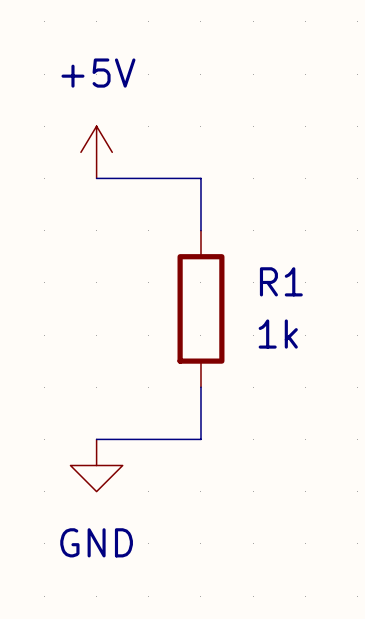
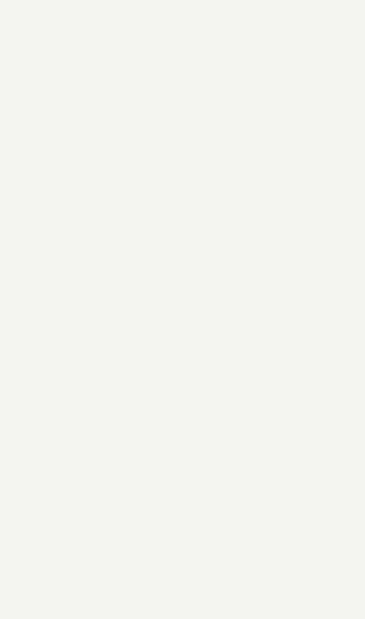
power symbol: +5V (96, 152) -> none
wire: (96, 178) (200, 178) (200, 230) -> none
R1: 1k (200, 308) -> none
wire: (200, 387) (200, 439) (96, 439) -> none
power symbol: GND (96, 465) -> none

